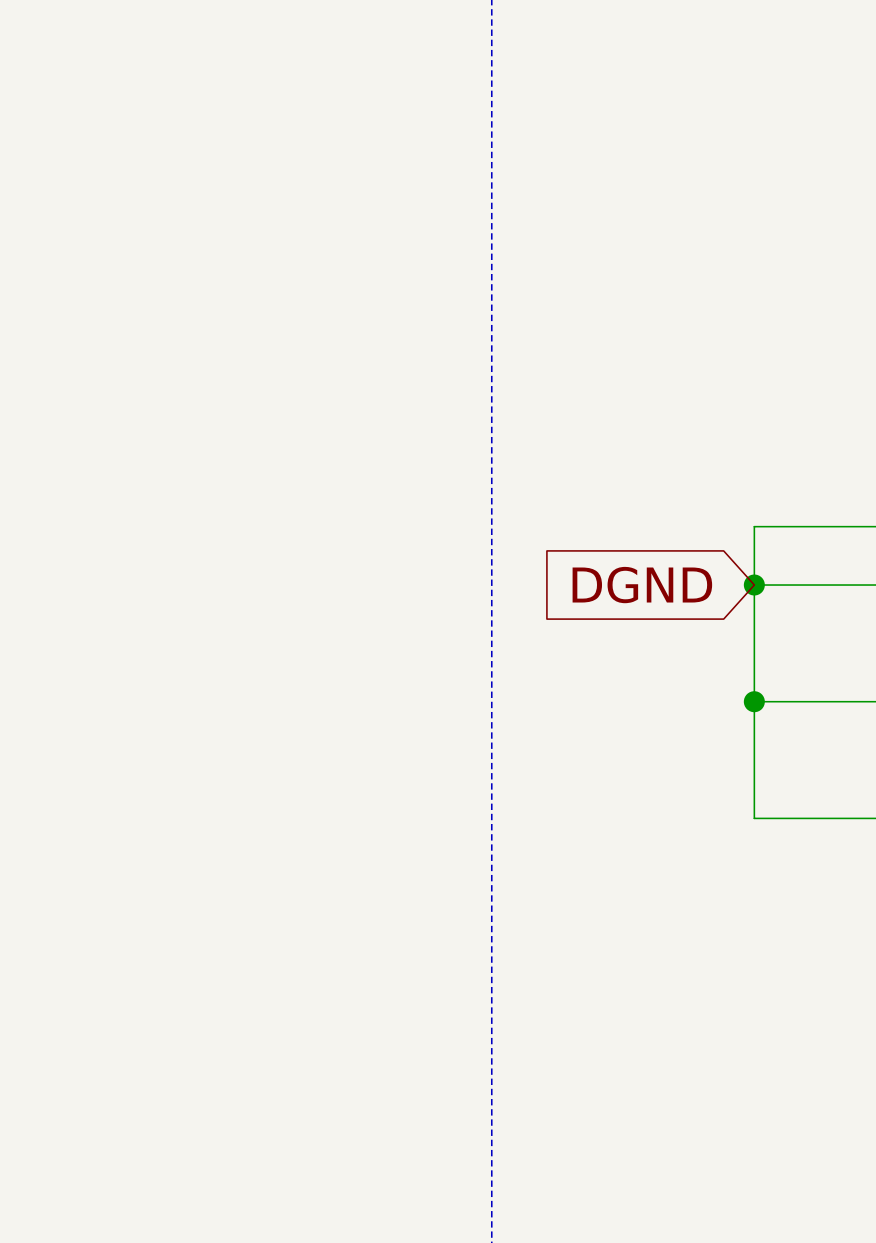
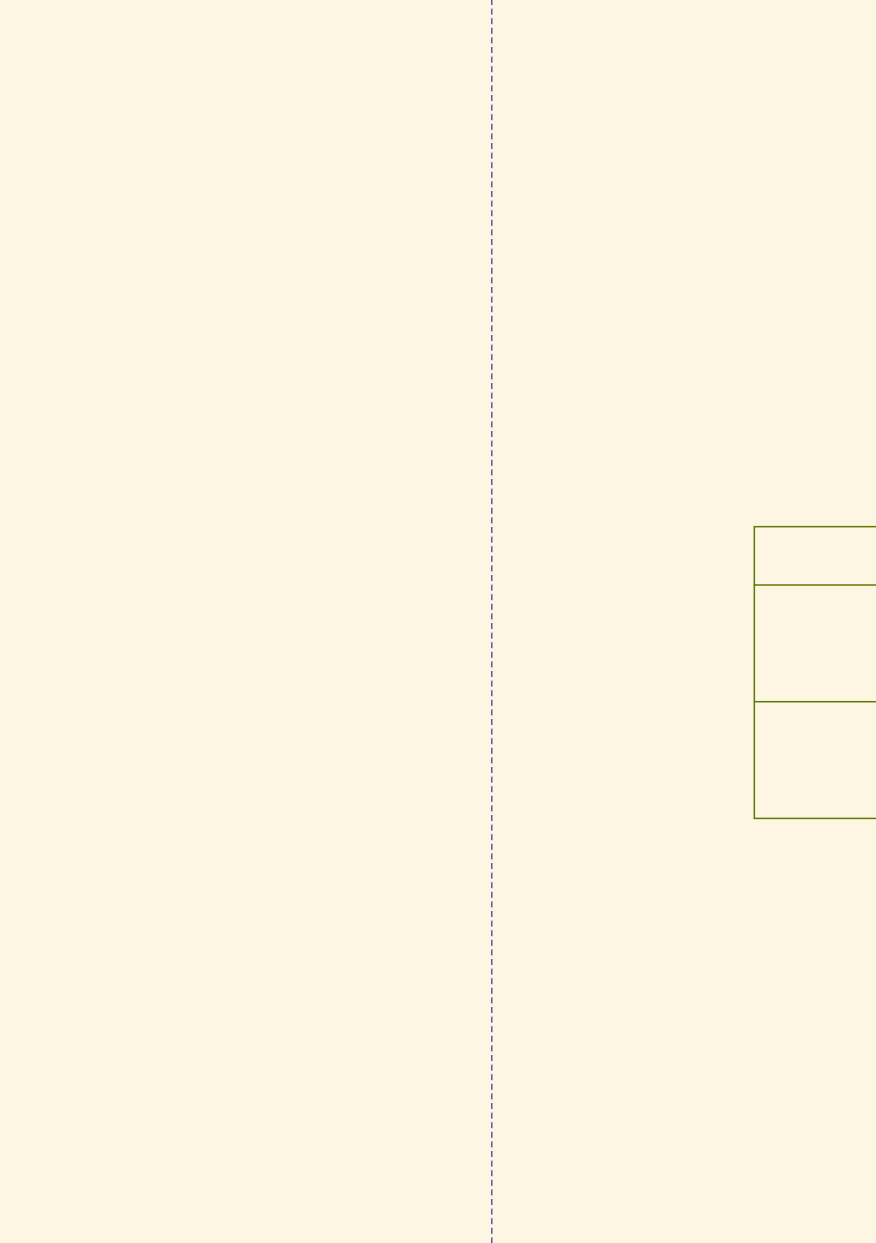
global label: DGND (642, 585) -> none
junction: (754, 585) -> none
junction: (754, 701) -> none

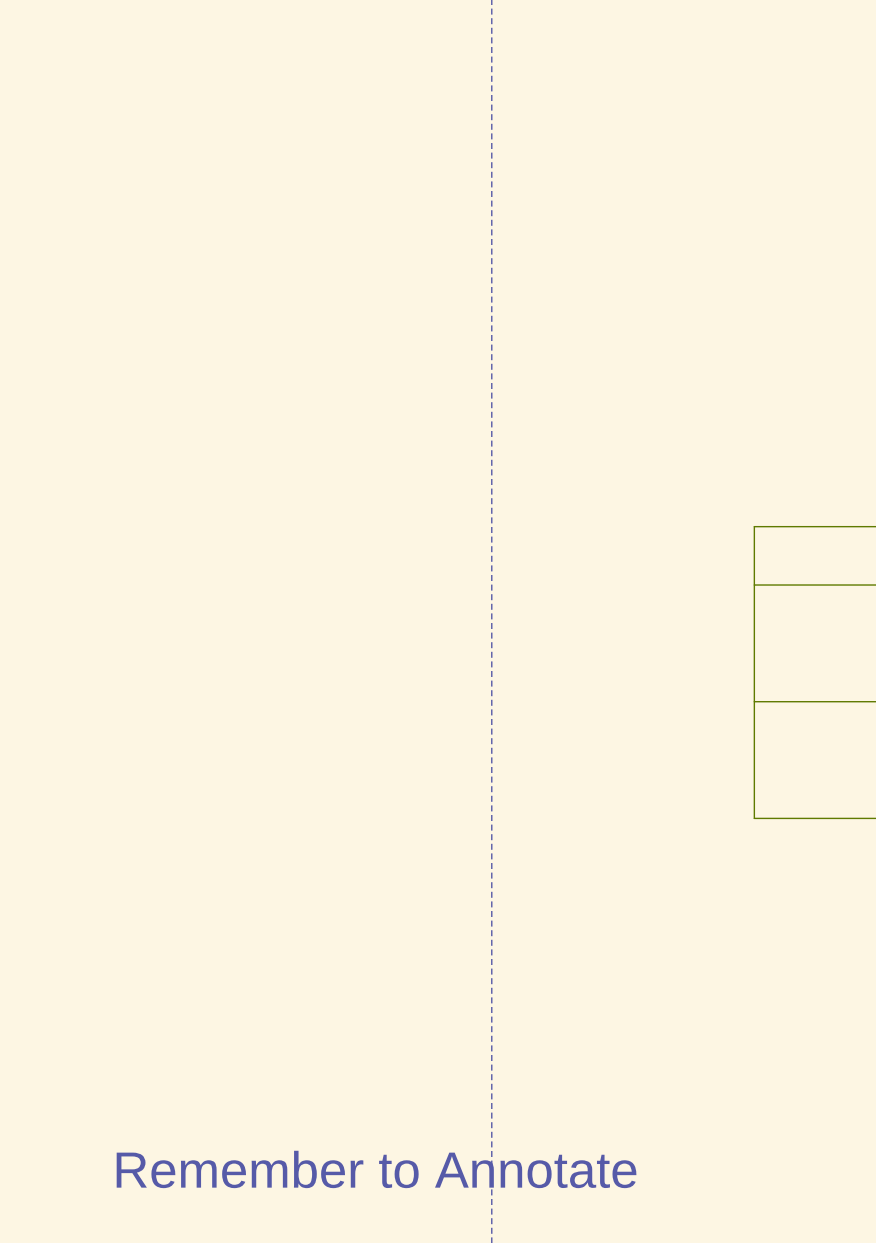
text: none -> Remember to Annotate (376, 1169)

